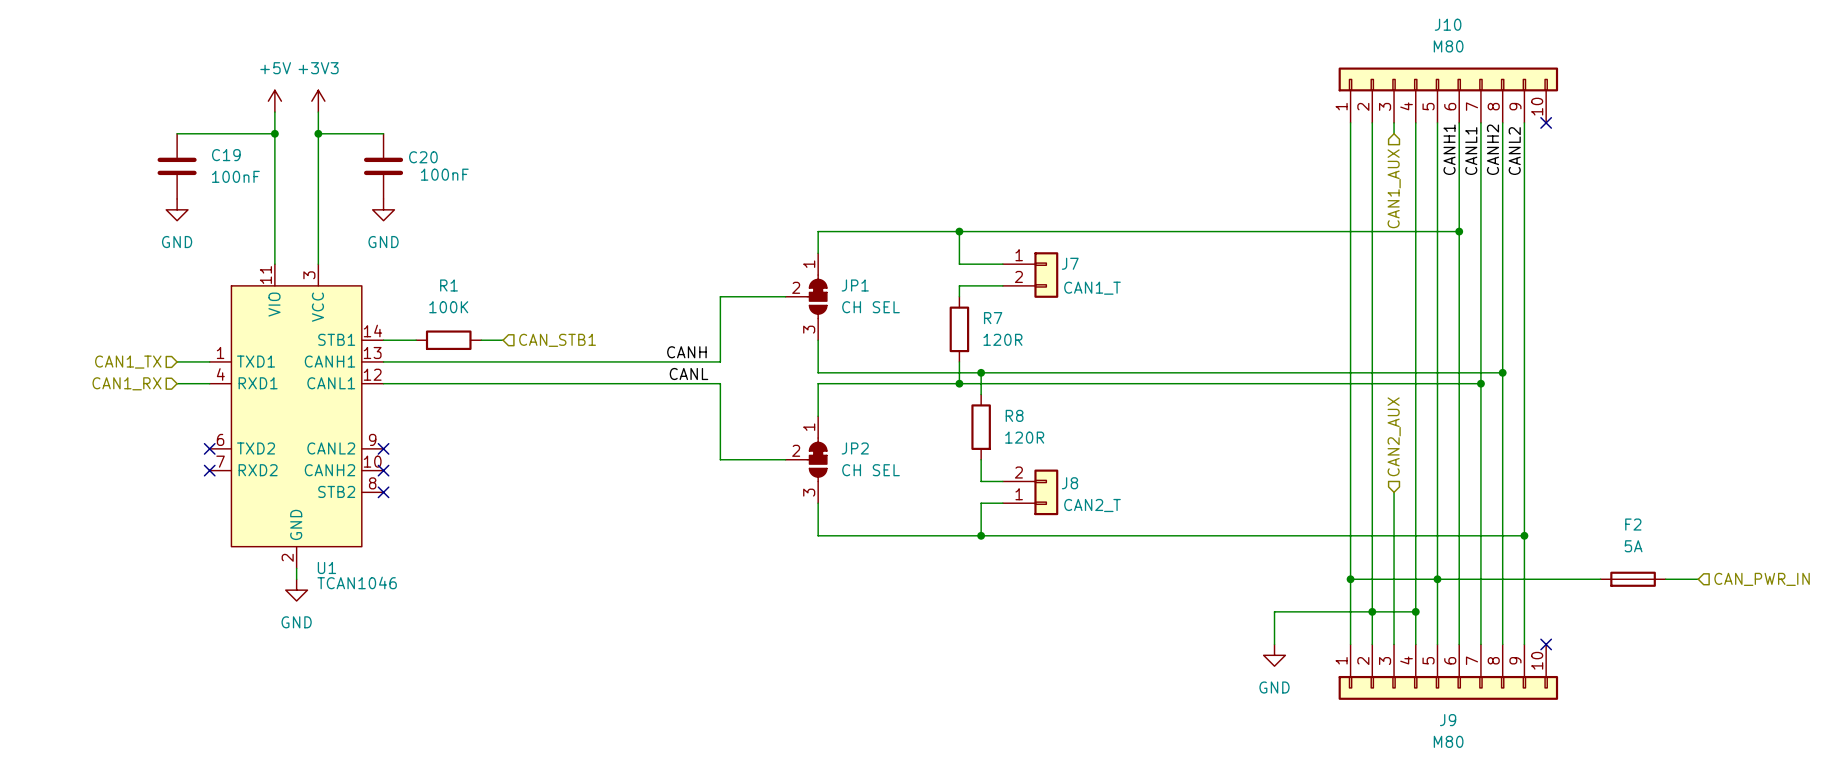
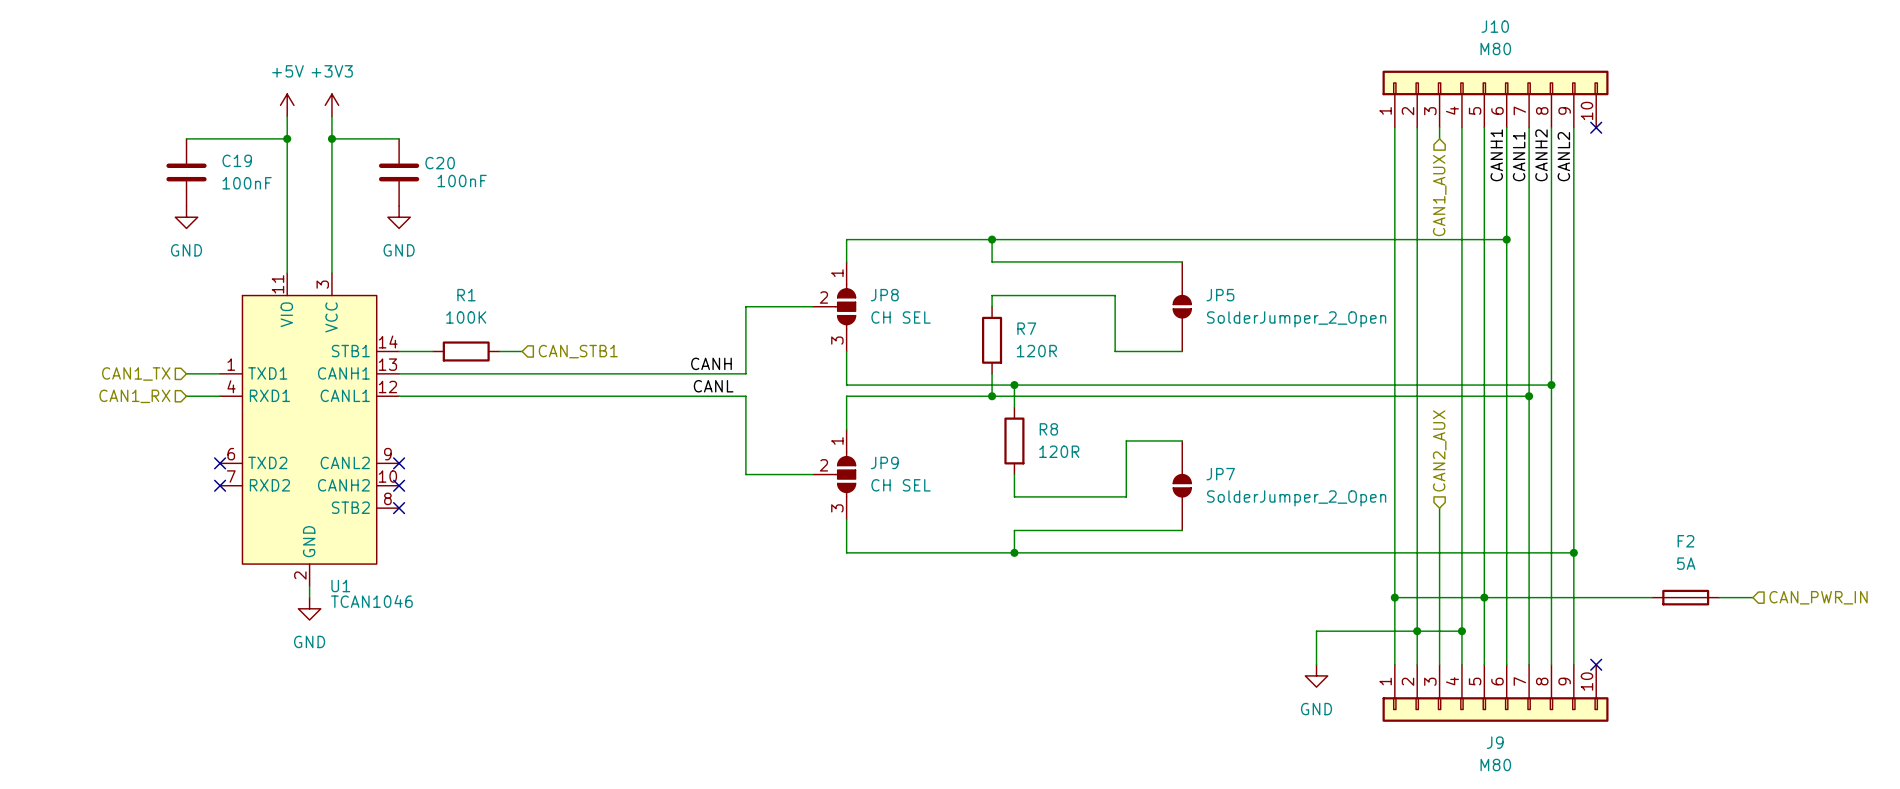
wire: (959, 253) (959, 264) (1002, 264) -> (992, 261) (1182, 261)
J7: CAN1_T (1030, 275) -> none
wire: none -> (1036, 295) (1115, 295) (1115, 351) (1182, 351)
JP1: CH SEL (806, 296) -> none
JP8: none -> CH SEL (834, 306)
JP5: none -> SolderJumper_2_Open (1182, 306)
wire: none -> (1182, 440) (1126, 440) (1126, 496) (1036, 496)
JP2: CH SEL (806, 459) -> none
JP9: none -> CH SEL (834, 474)
JP7: none -> SolderJumper_2_Open (1182, 485)
J8: CAN2_T (1030, 492) -> none
wire: (1002, 503) (981, 503) (981, 514) -> (1182, 530) (1014, 530)

